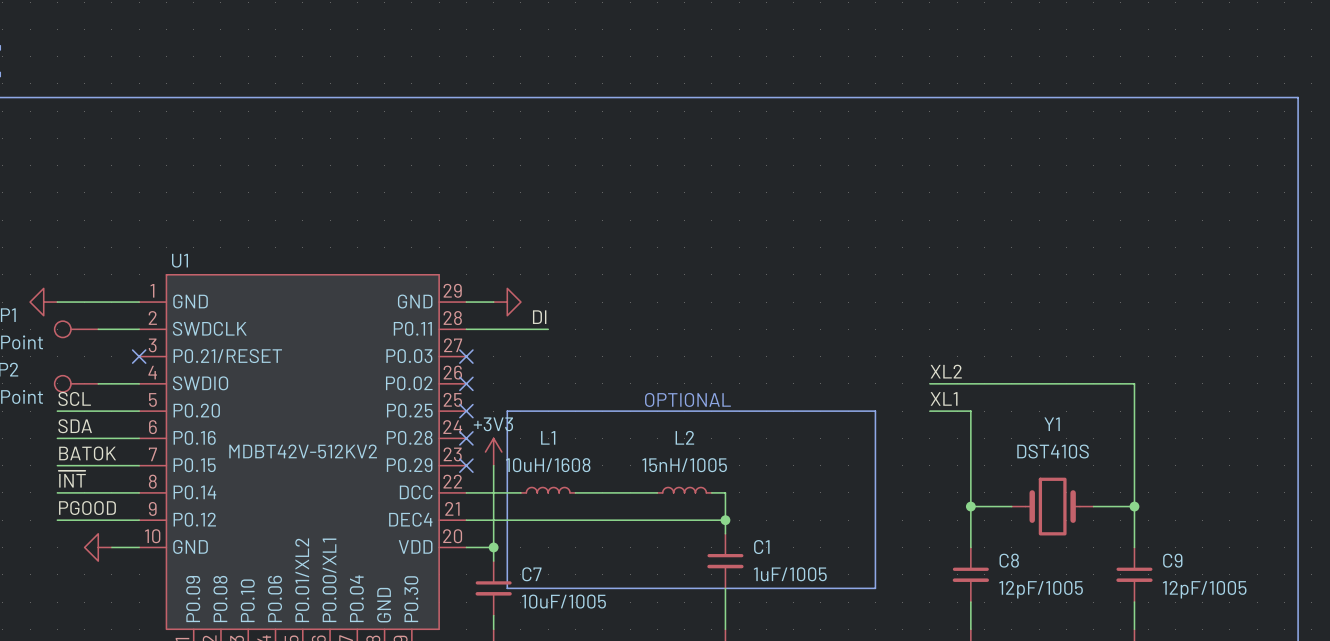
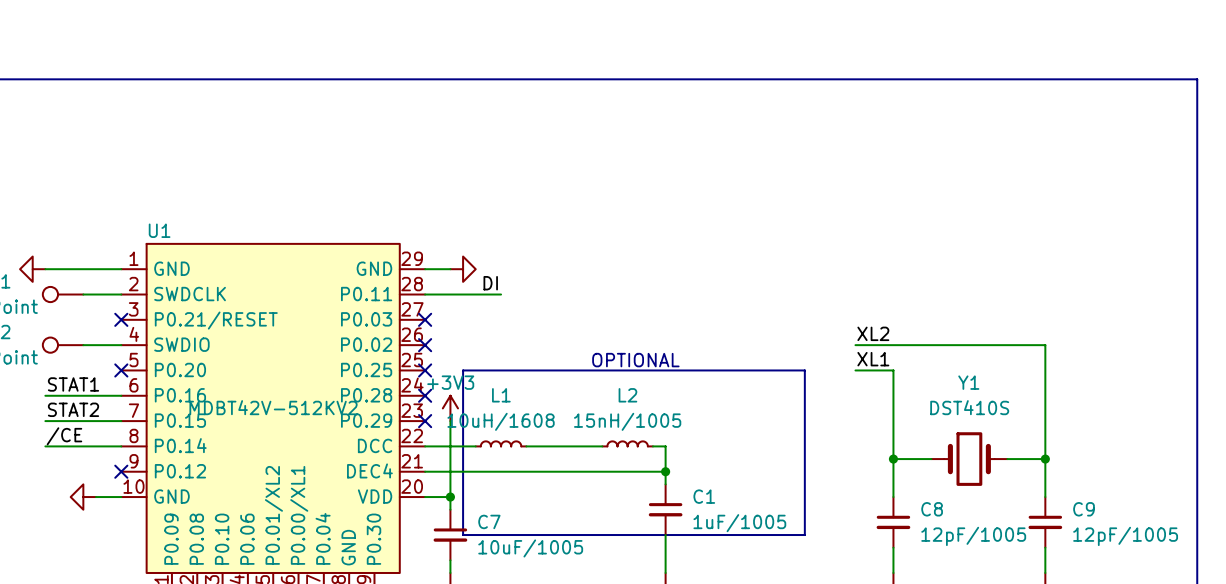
label: SCL (74, 398) -> none
wire: (57, 411) (139, 411) -> none
no-connect mark: none -> (121, 370)
label: SDA (75, 426) -> STAT1 (73, 384)
label: BATOK (87, 453) -> STAT2 (73, 409)
label: ~{INT} (72, 479) -> /CE (64, 436)
label: PGOOD (87, 508) -> none
wire: (57, 520) (139, 520) -> none
no-connect mark: none -> (121, 471)

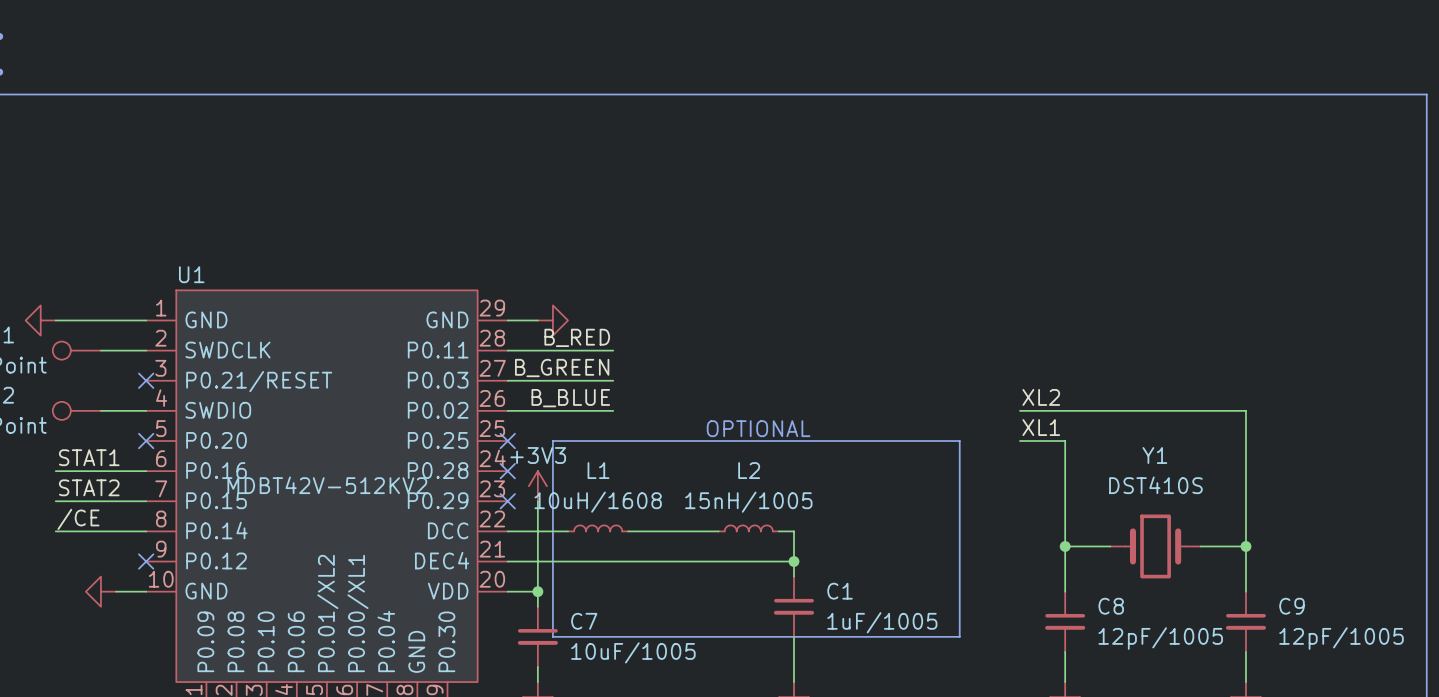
label: none -> B_RED (577, 337)
label: DI (490, 283) -> none
wire: none -> (598, 350) (613, 350)
label: none -> B_GREEN (562, 368)
wire: none -> (507, 380) (613, 380)
no-connect mark: (425, 319) -> none
label: none -> B_BLUE (570, 398)
wire: none -> (507, 410) (613, 410)
no-connect mark: (425, 345) -> none

